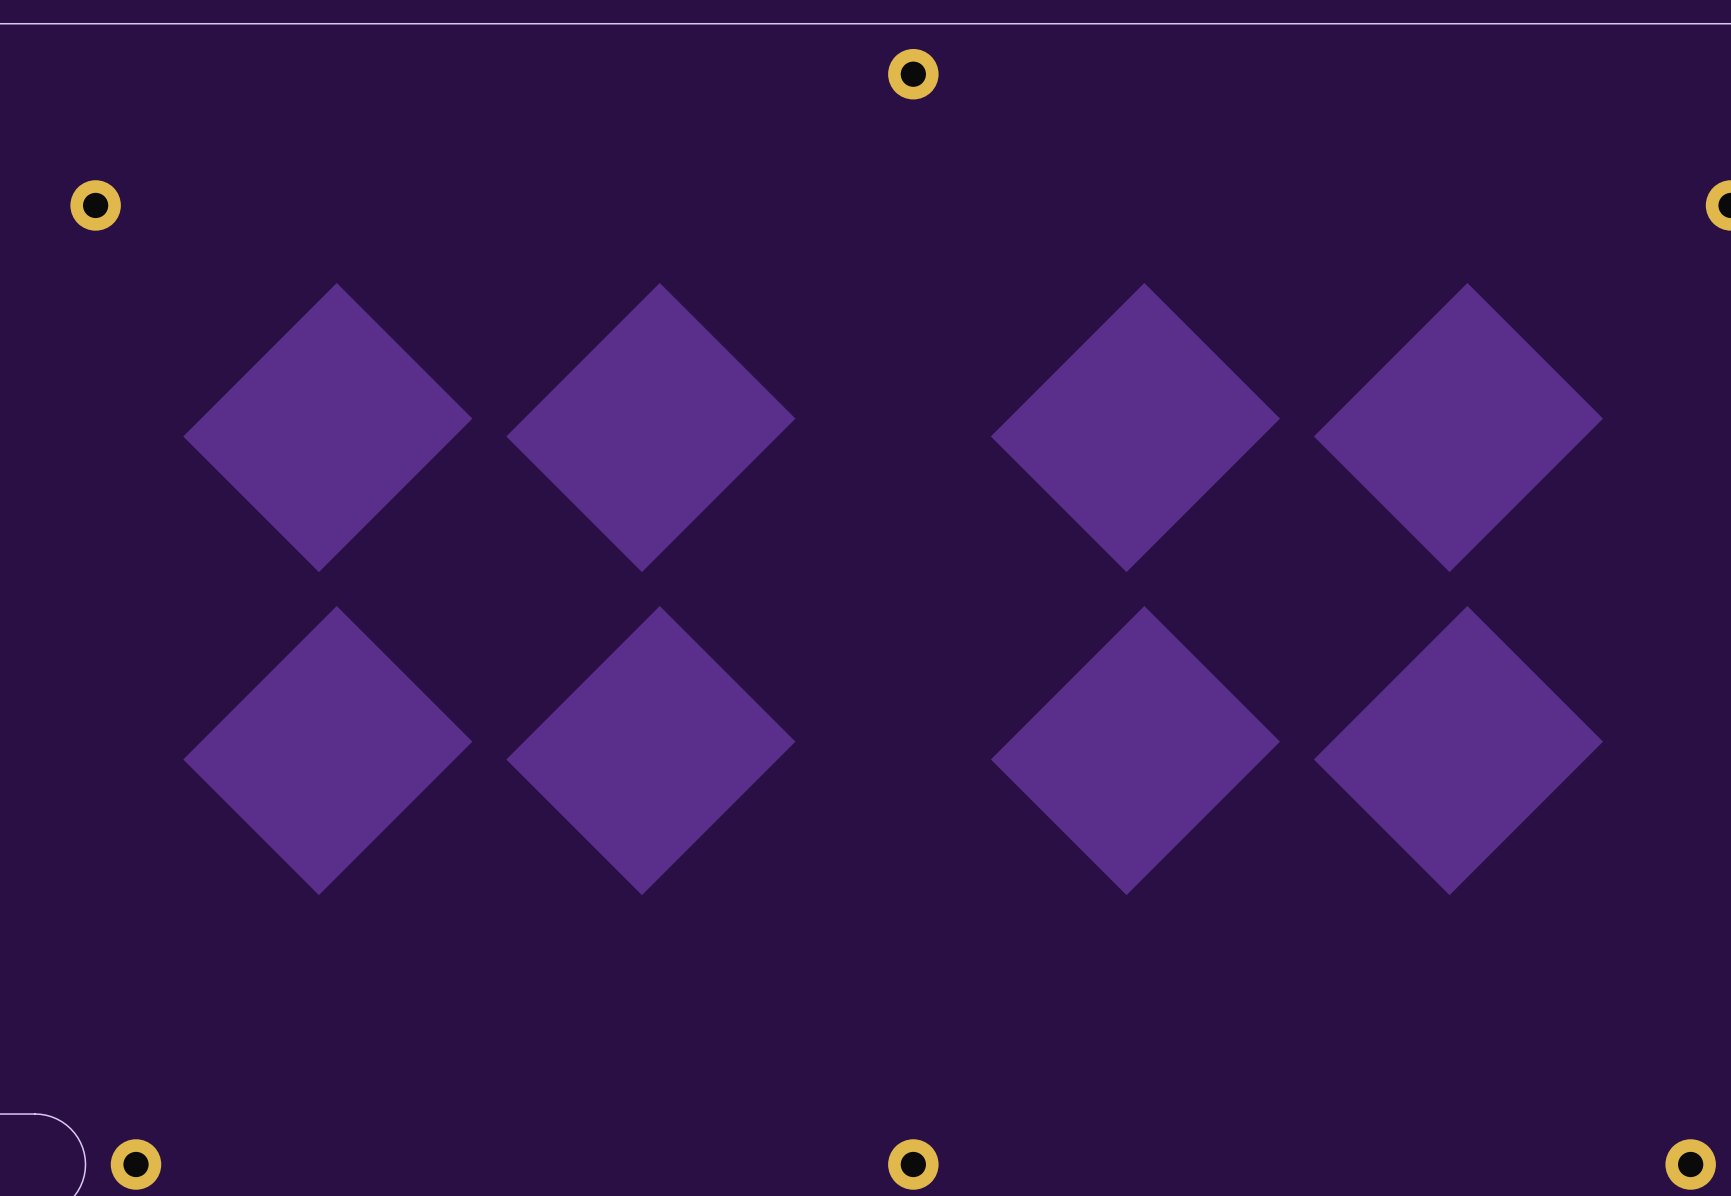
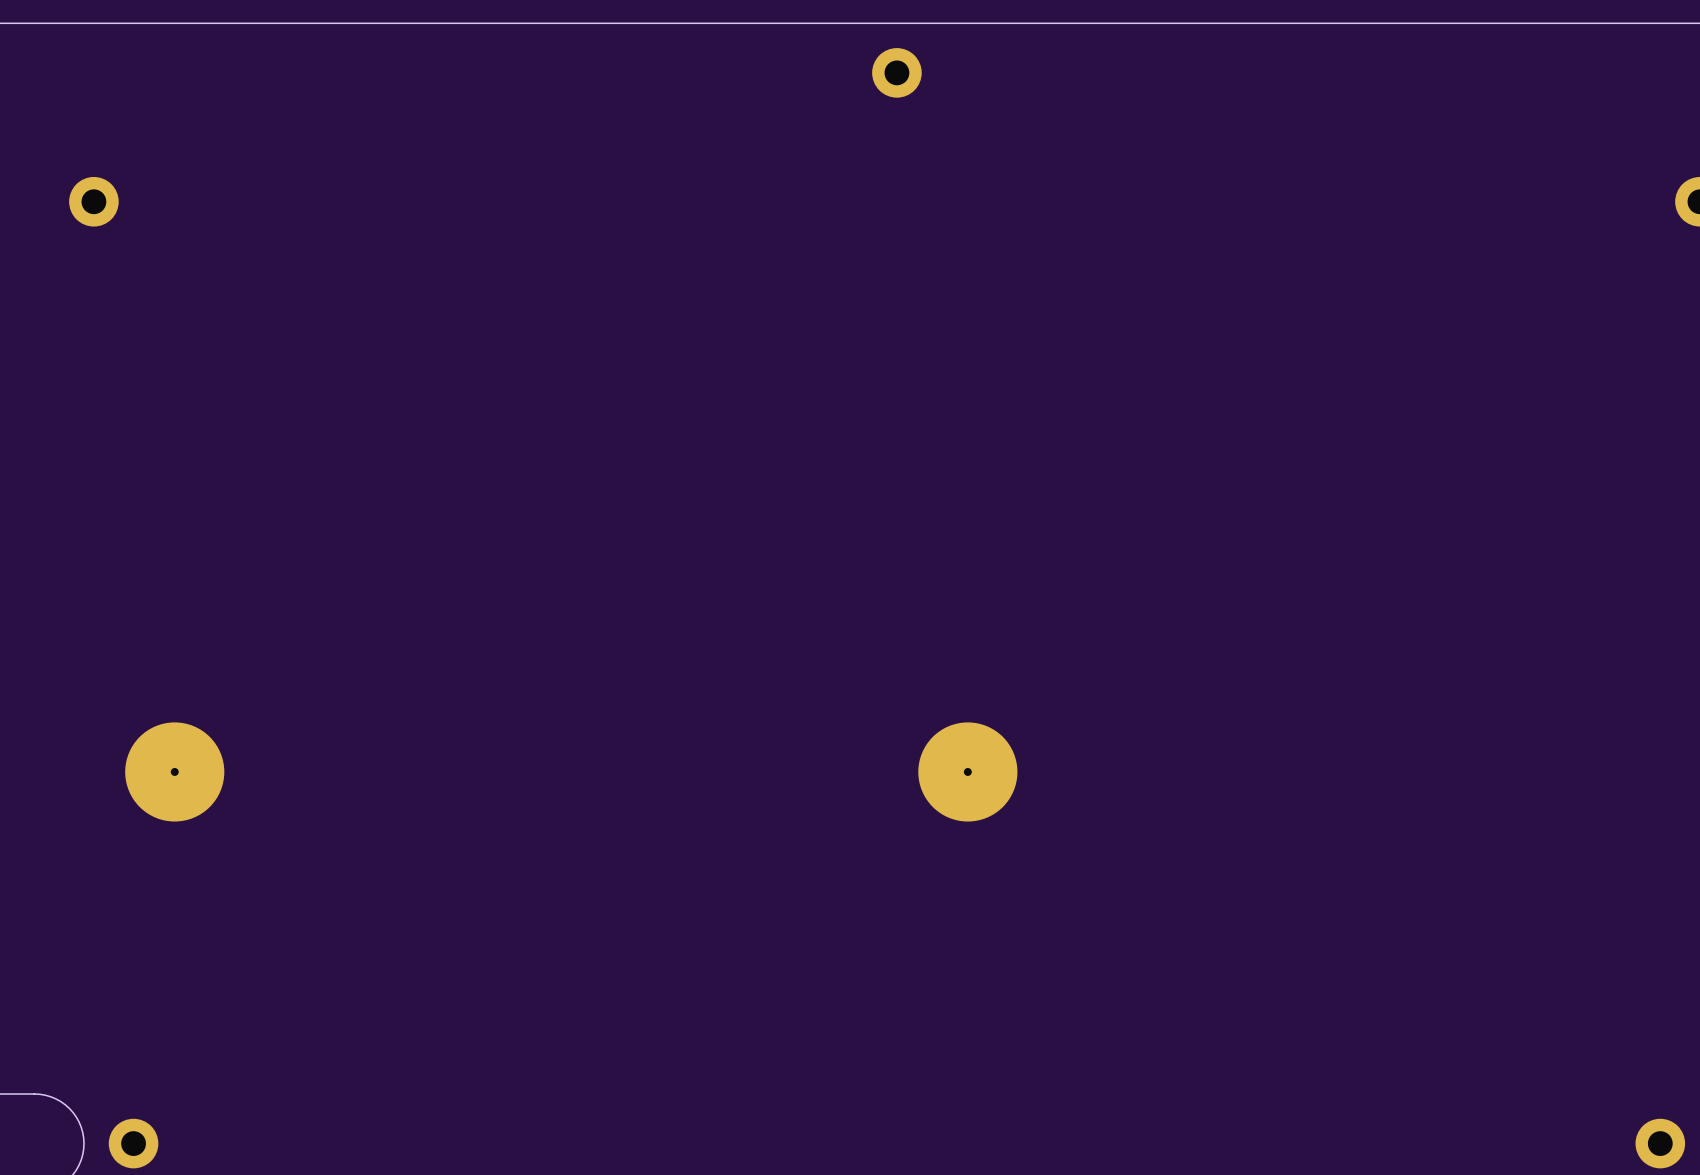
drawing: [183, 282, 473, 573] -> none
drawing: [506, 282, 796, 573] -> none
drawing: [990, 282, 1280, 573] -> none
drawing: [1313, 282, 1604, 573] -> none
drawing: [183, 606, 473, 896] -> none
drawing: [506, 606, 796, 896] -> none
drawing: [990, 606, 1280, 896] -> none
drawing: [1313, 606, 1604, 896] -> none
part: none -> (174, 771)
part: none -> (967, 771)
part: (913, 1164) -> none

